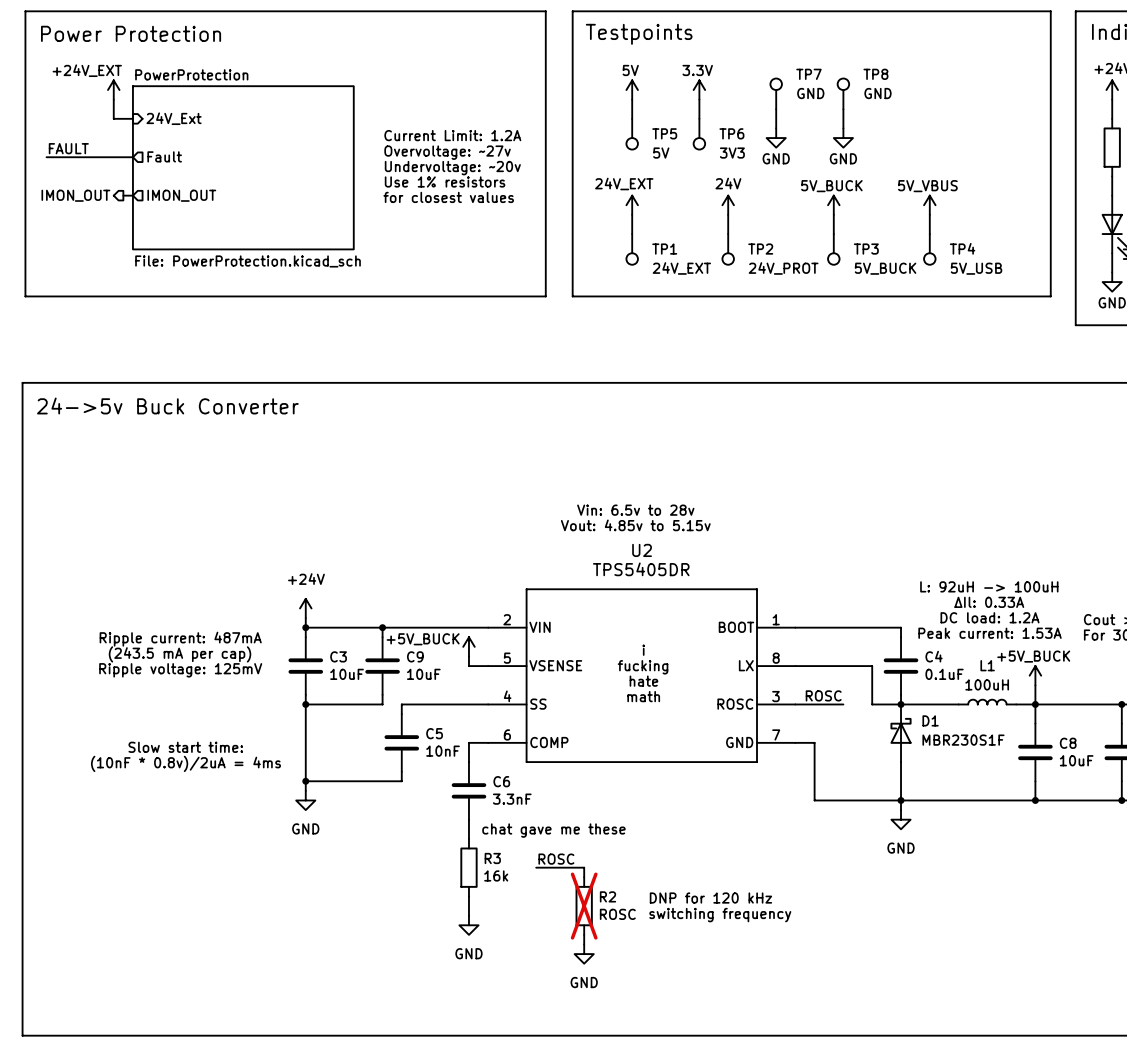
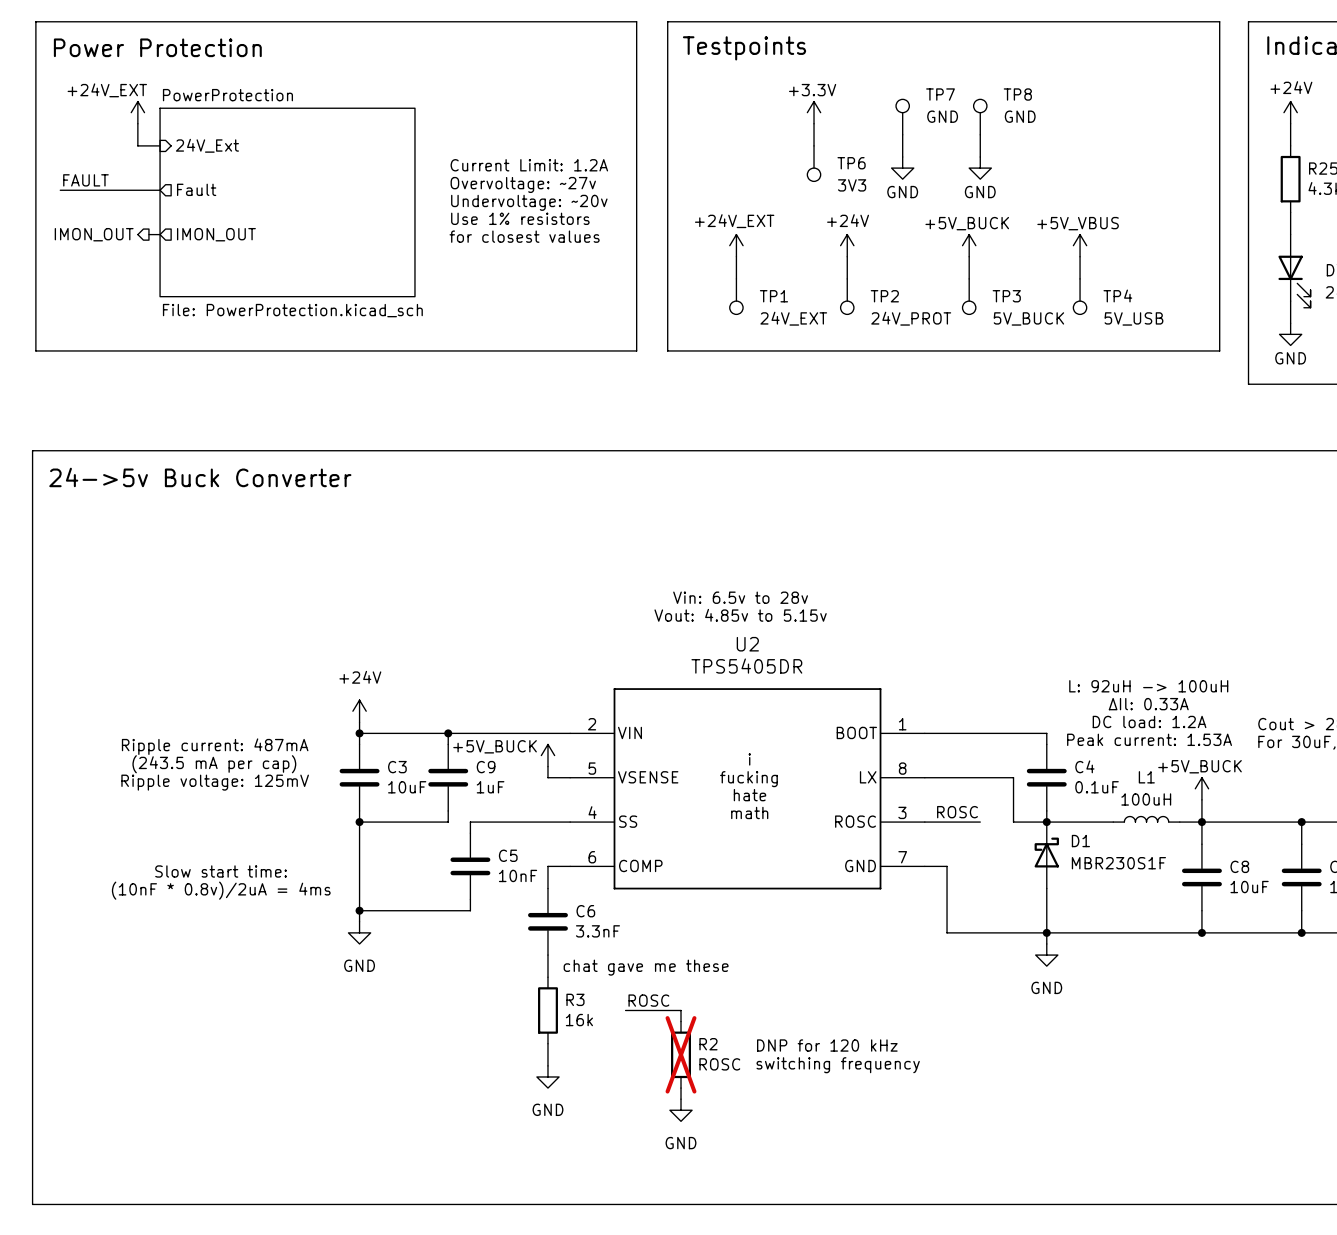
power symbol: 5V (632, 90) -> none
power symbol: 3.3V (699, 90) -> +3.3V (814, 112)
wire: (632, 99) (632, 118) -> none
TP5: 5V (632, 134) -> none
power symbol: 24V_EXT (632, 205) -> +24V_EXT (736, 245)
power symbol: 24V (728, 205) -> +24V (847, 245)
power symbol: 5V_BUCK (833, 205) -> +5V_BUCK (969, 245)
power symbol: 5V_VBUS (929, 205) -> +5V_VBUS (1080, 245)
C9 value: 10uF (423, 674) -> 1uF (490, 787)

